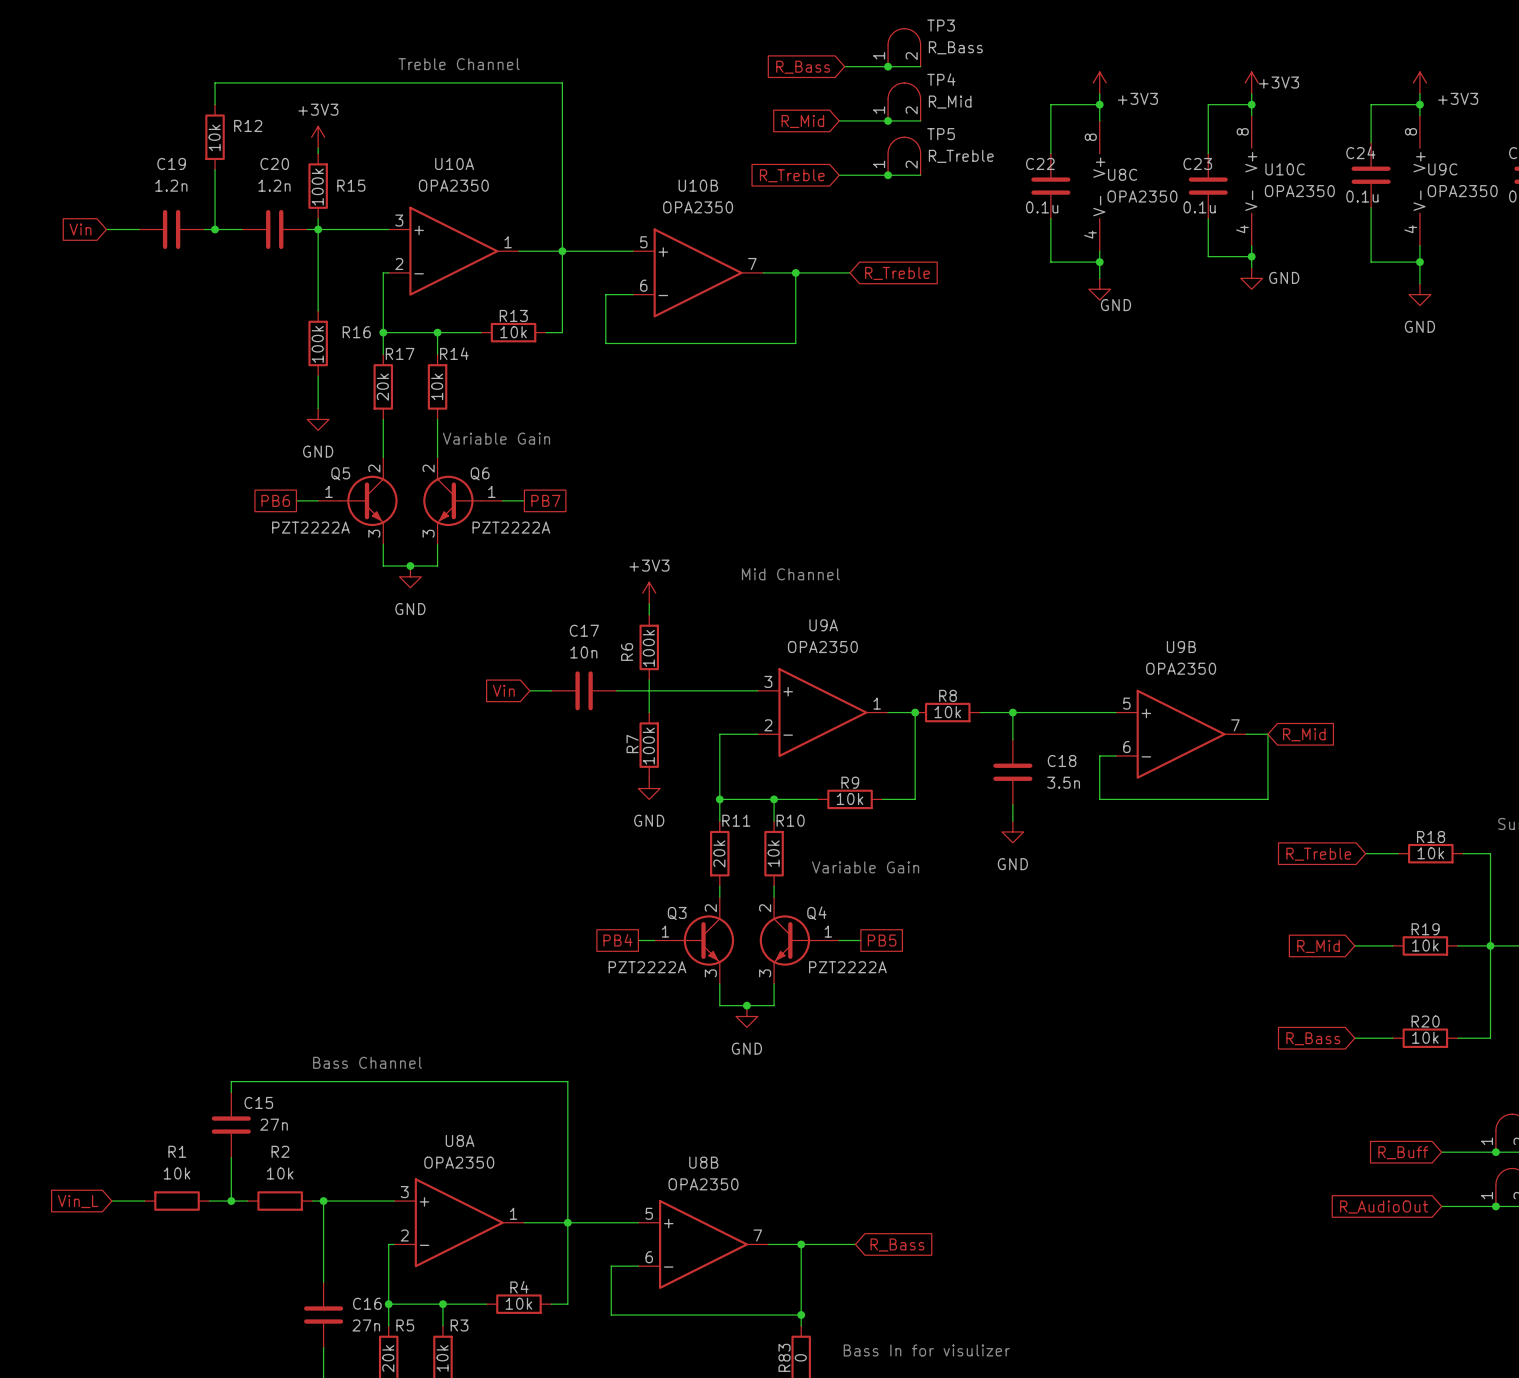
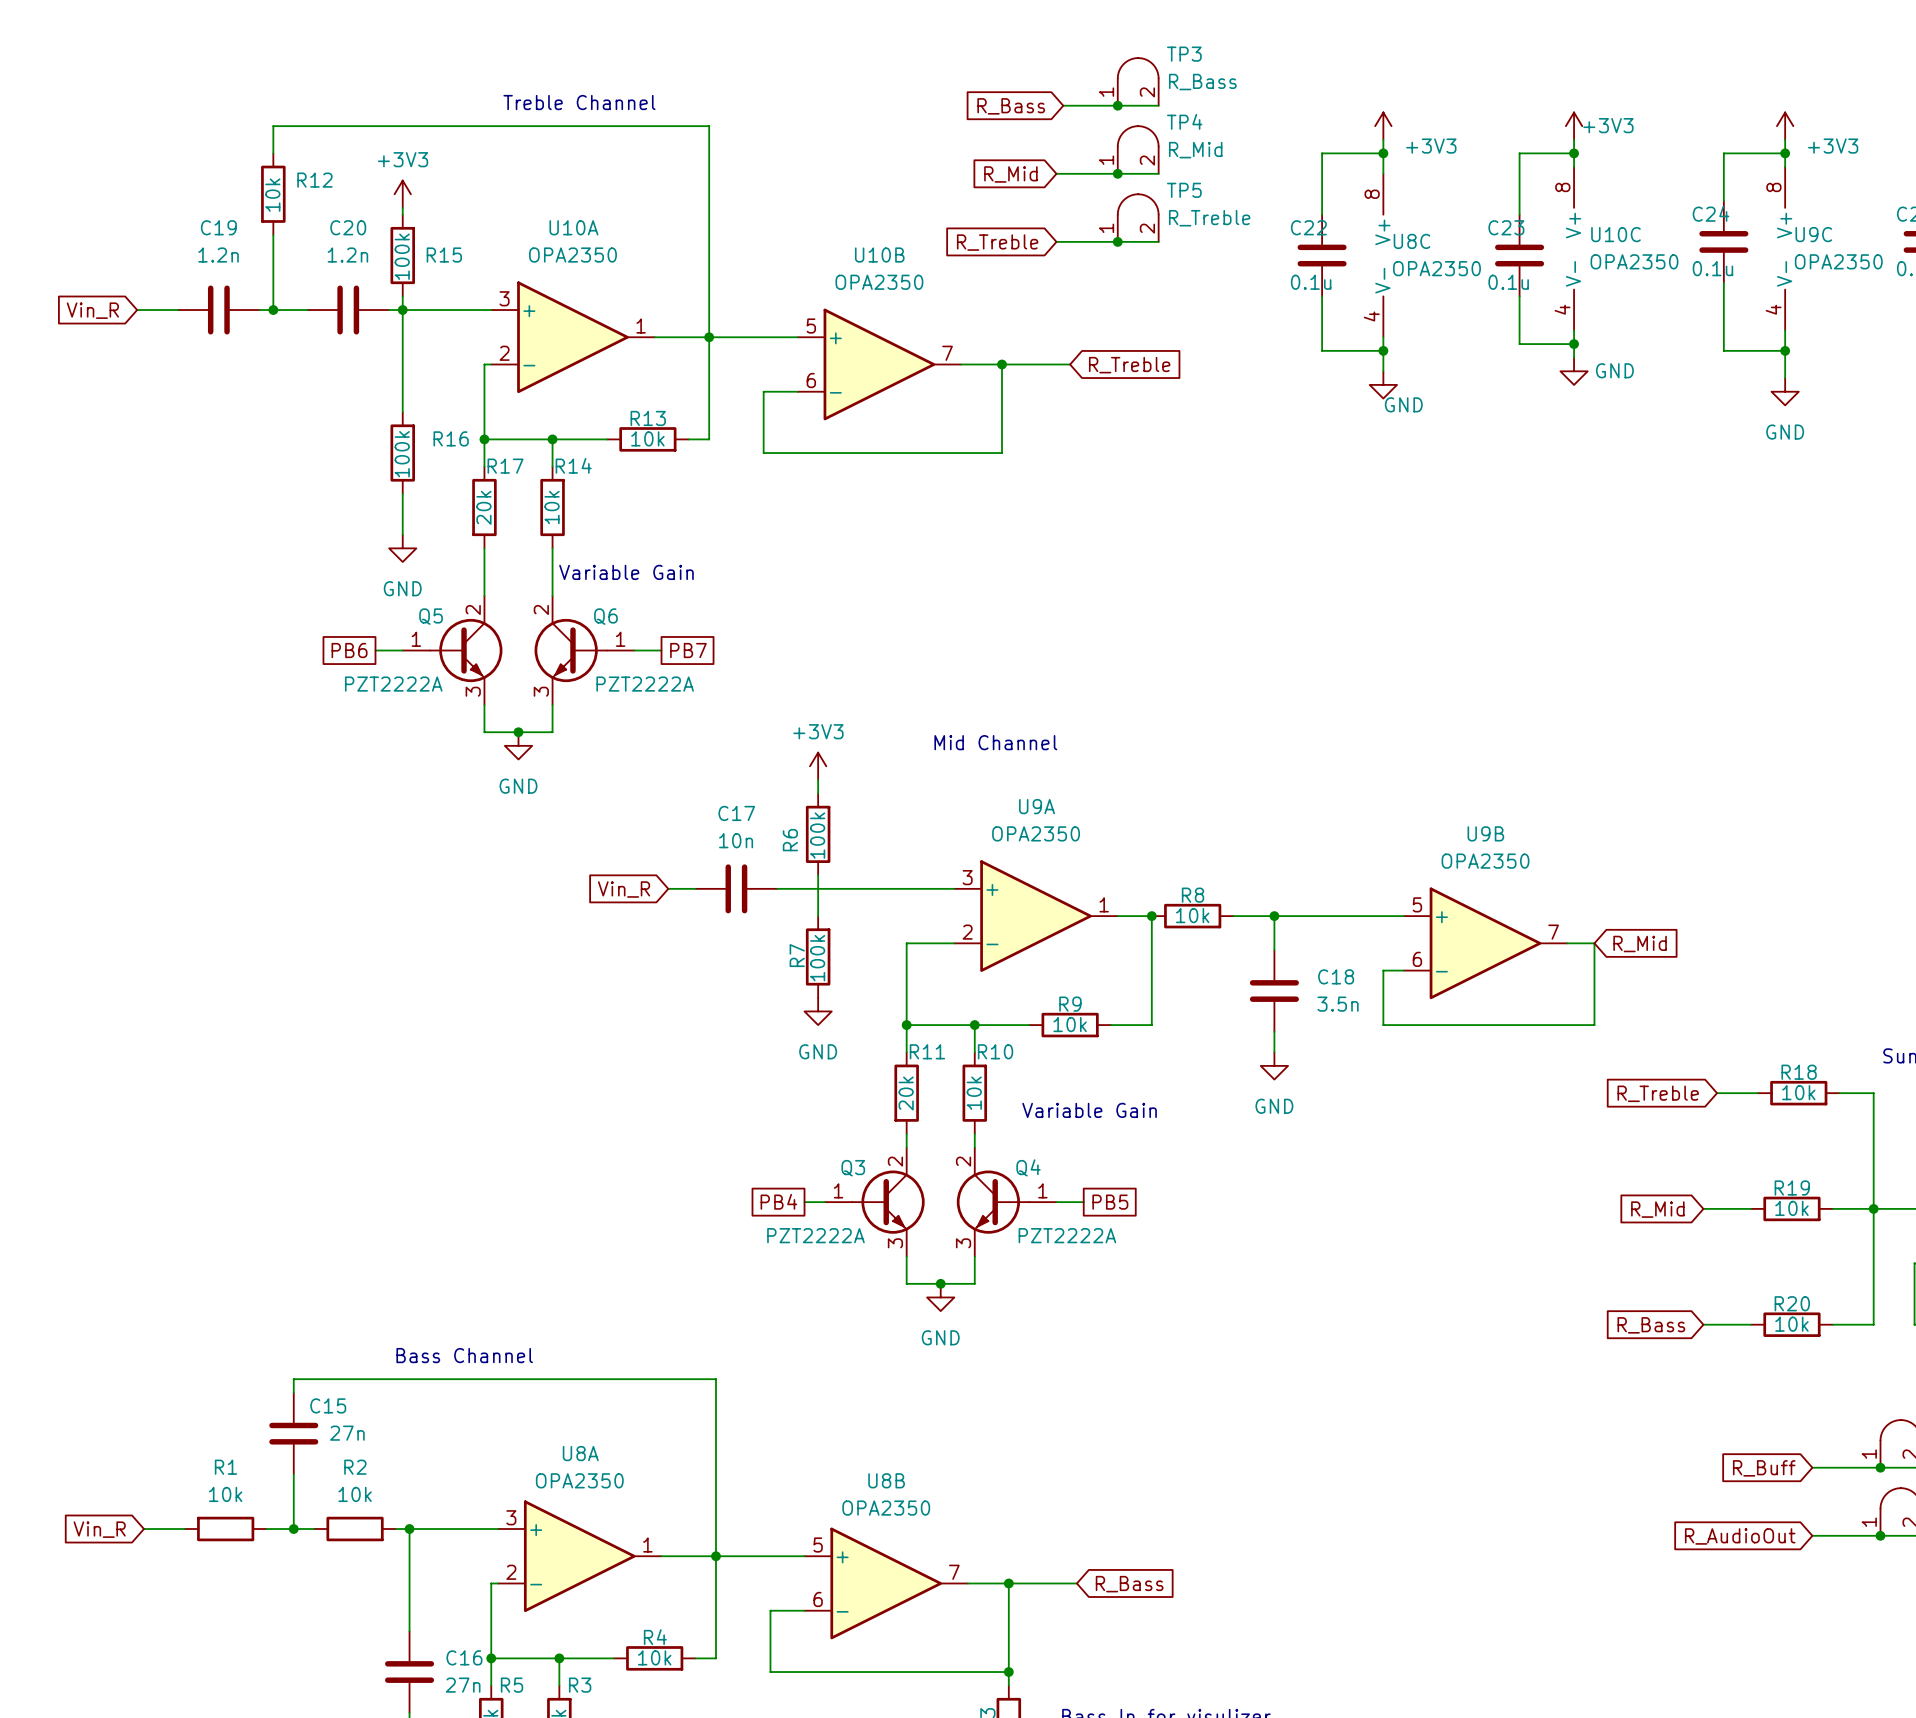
global label: Vin (80, 229) -> Vin_R (92, 310)
global label: Vin (503, 690) -> Vin_R (624, 889)
global label: Vin_L (78, 1201) -> Vin_R (99, 1529)

